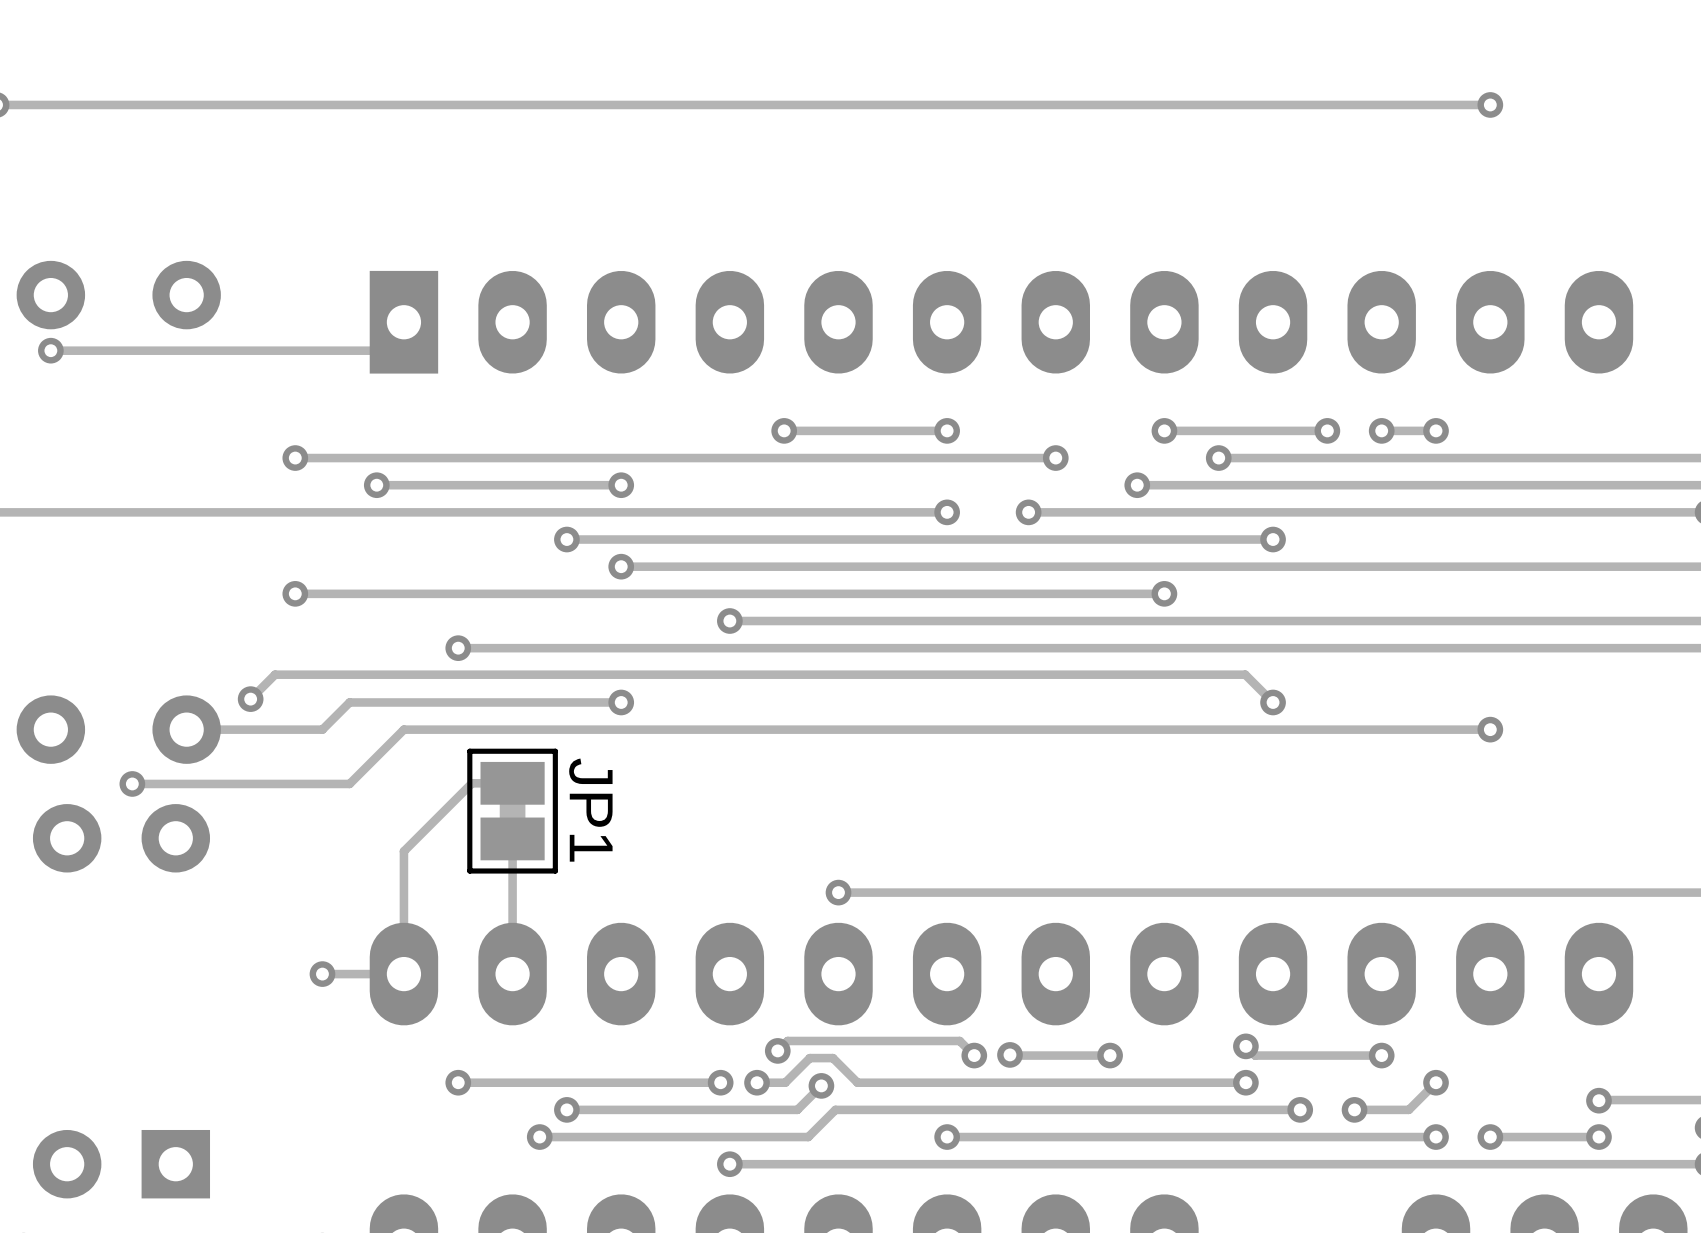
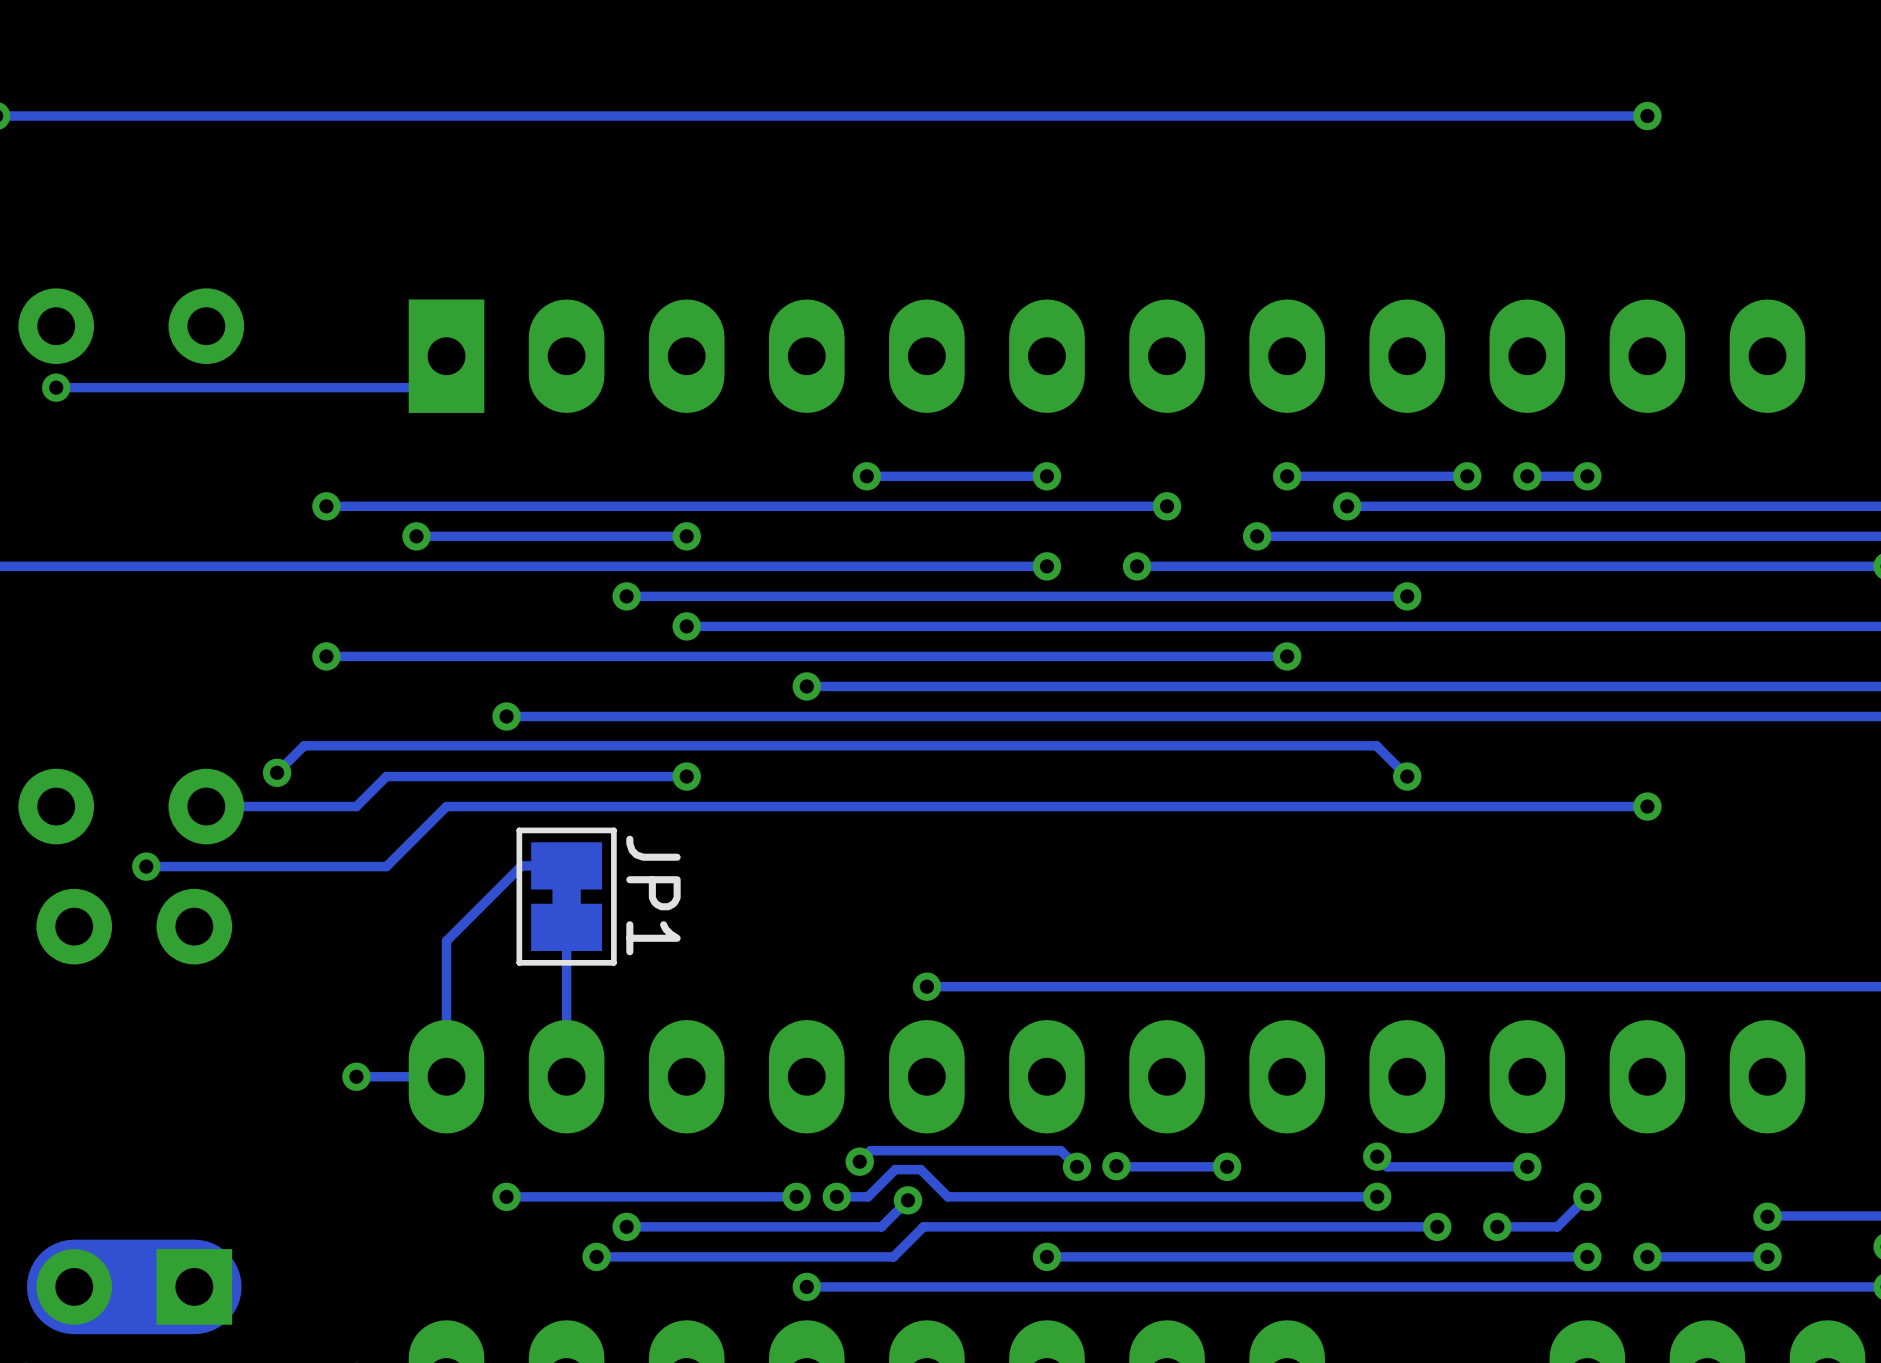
track: none -> (194, 1286) (74, 1286)

